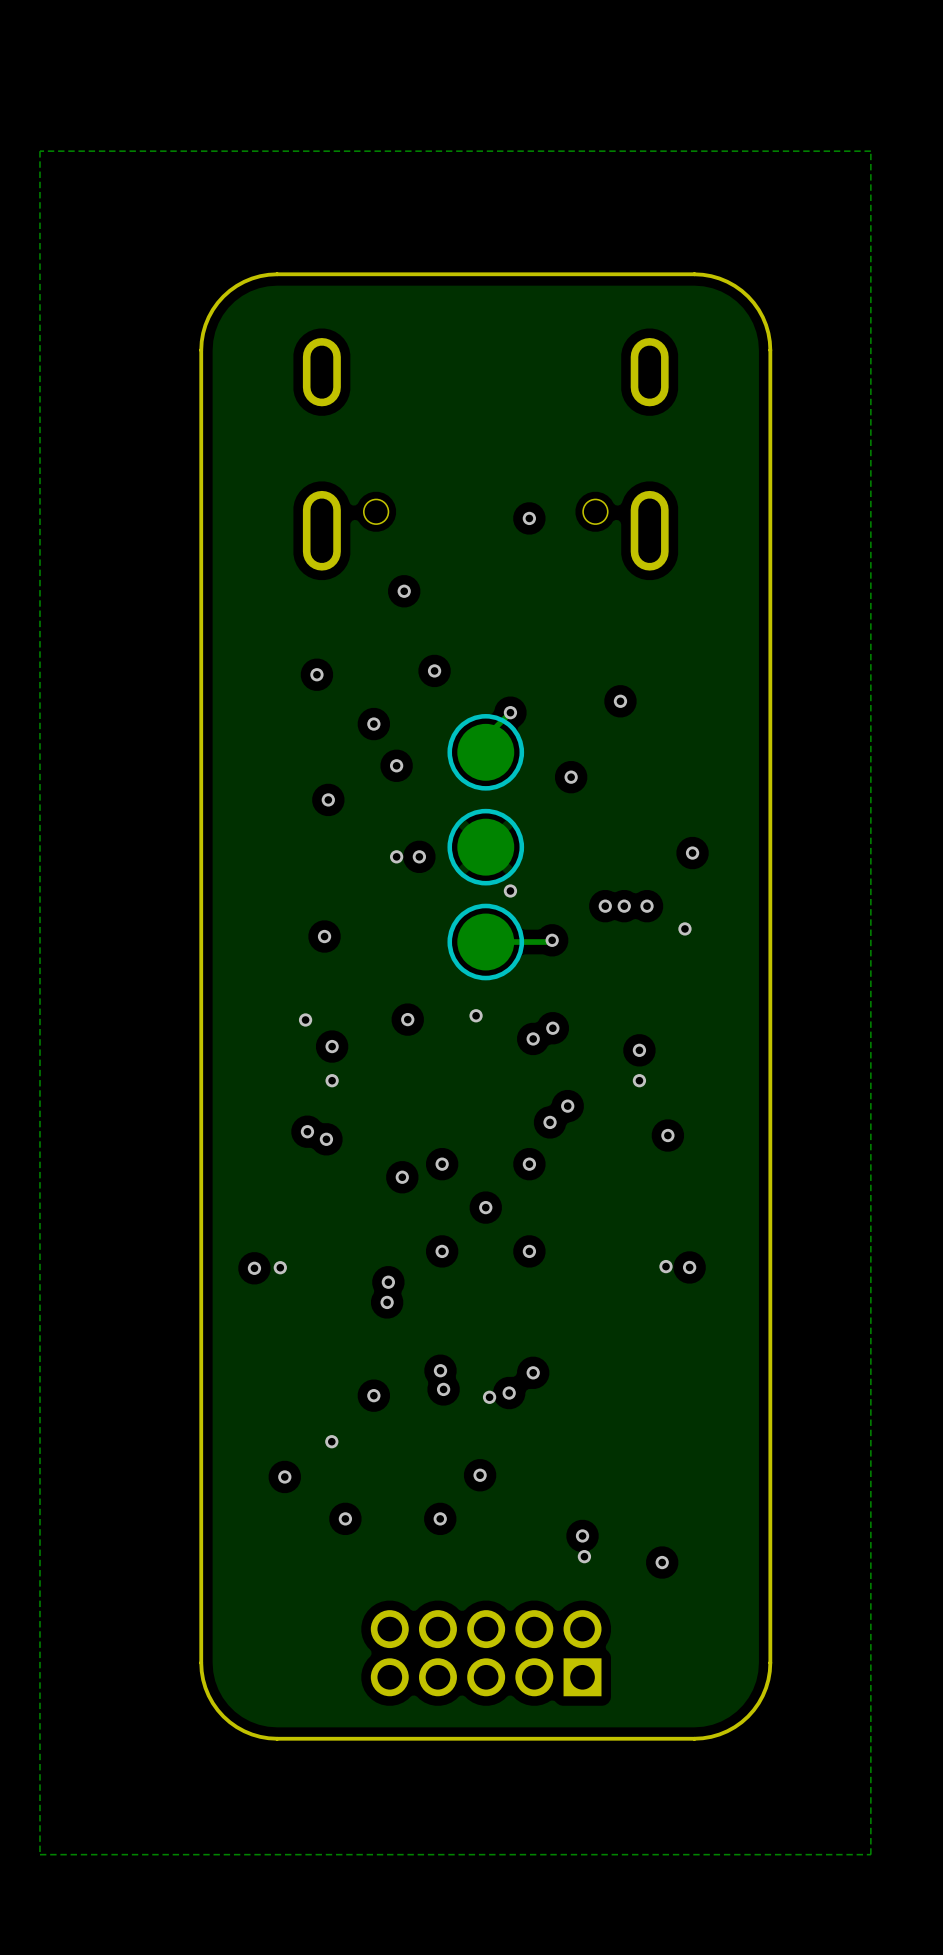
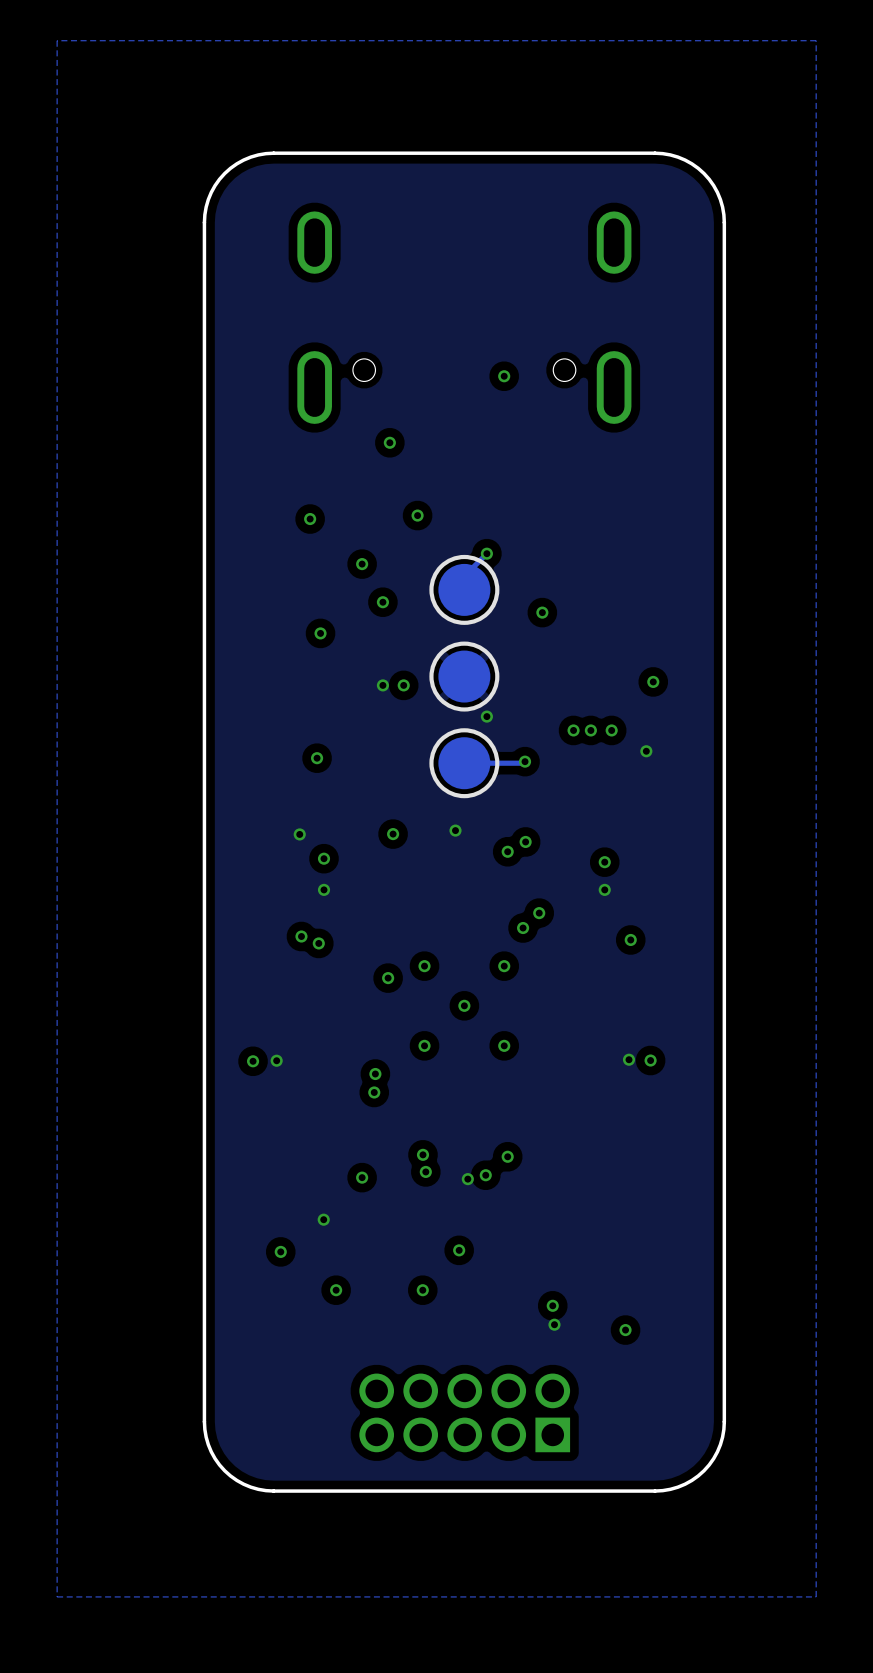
via: (620, 701) -> none

